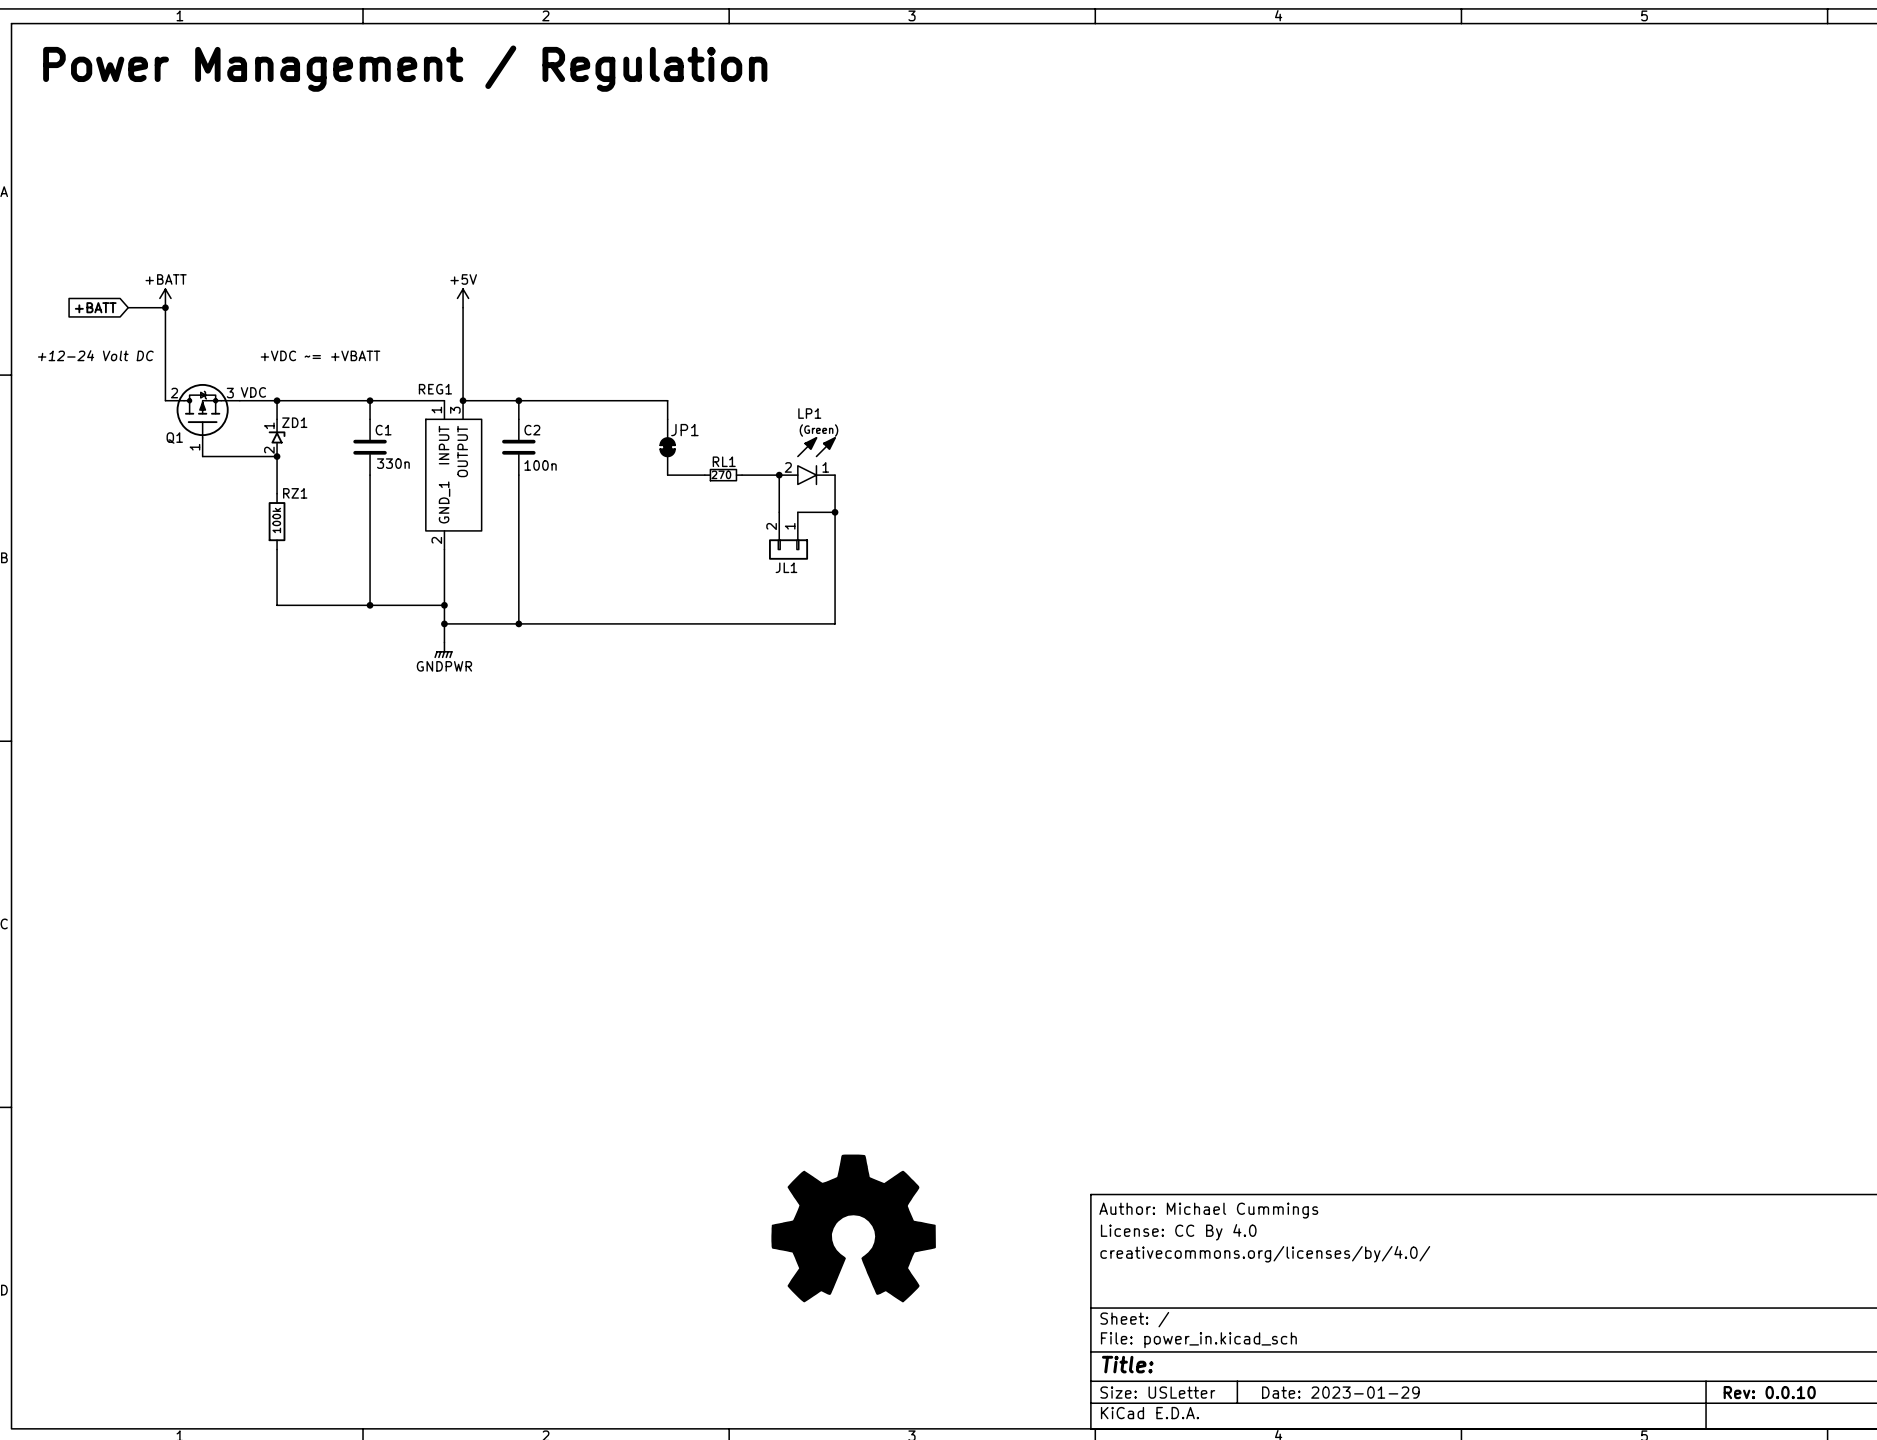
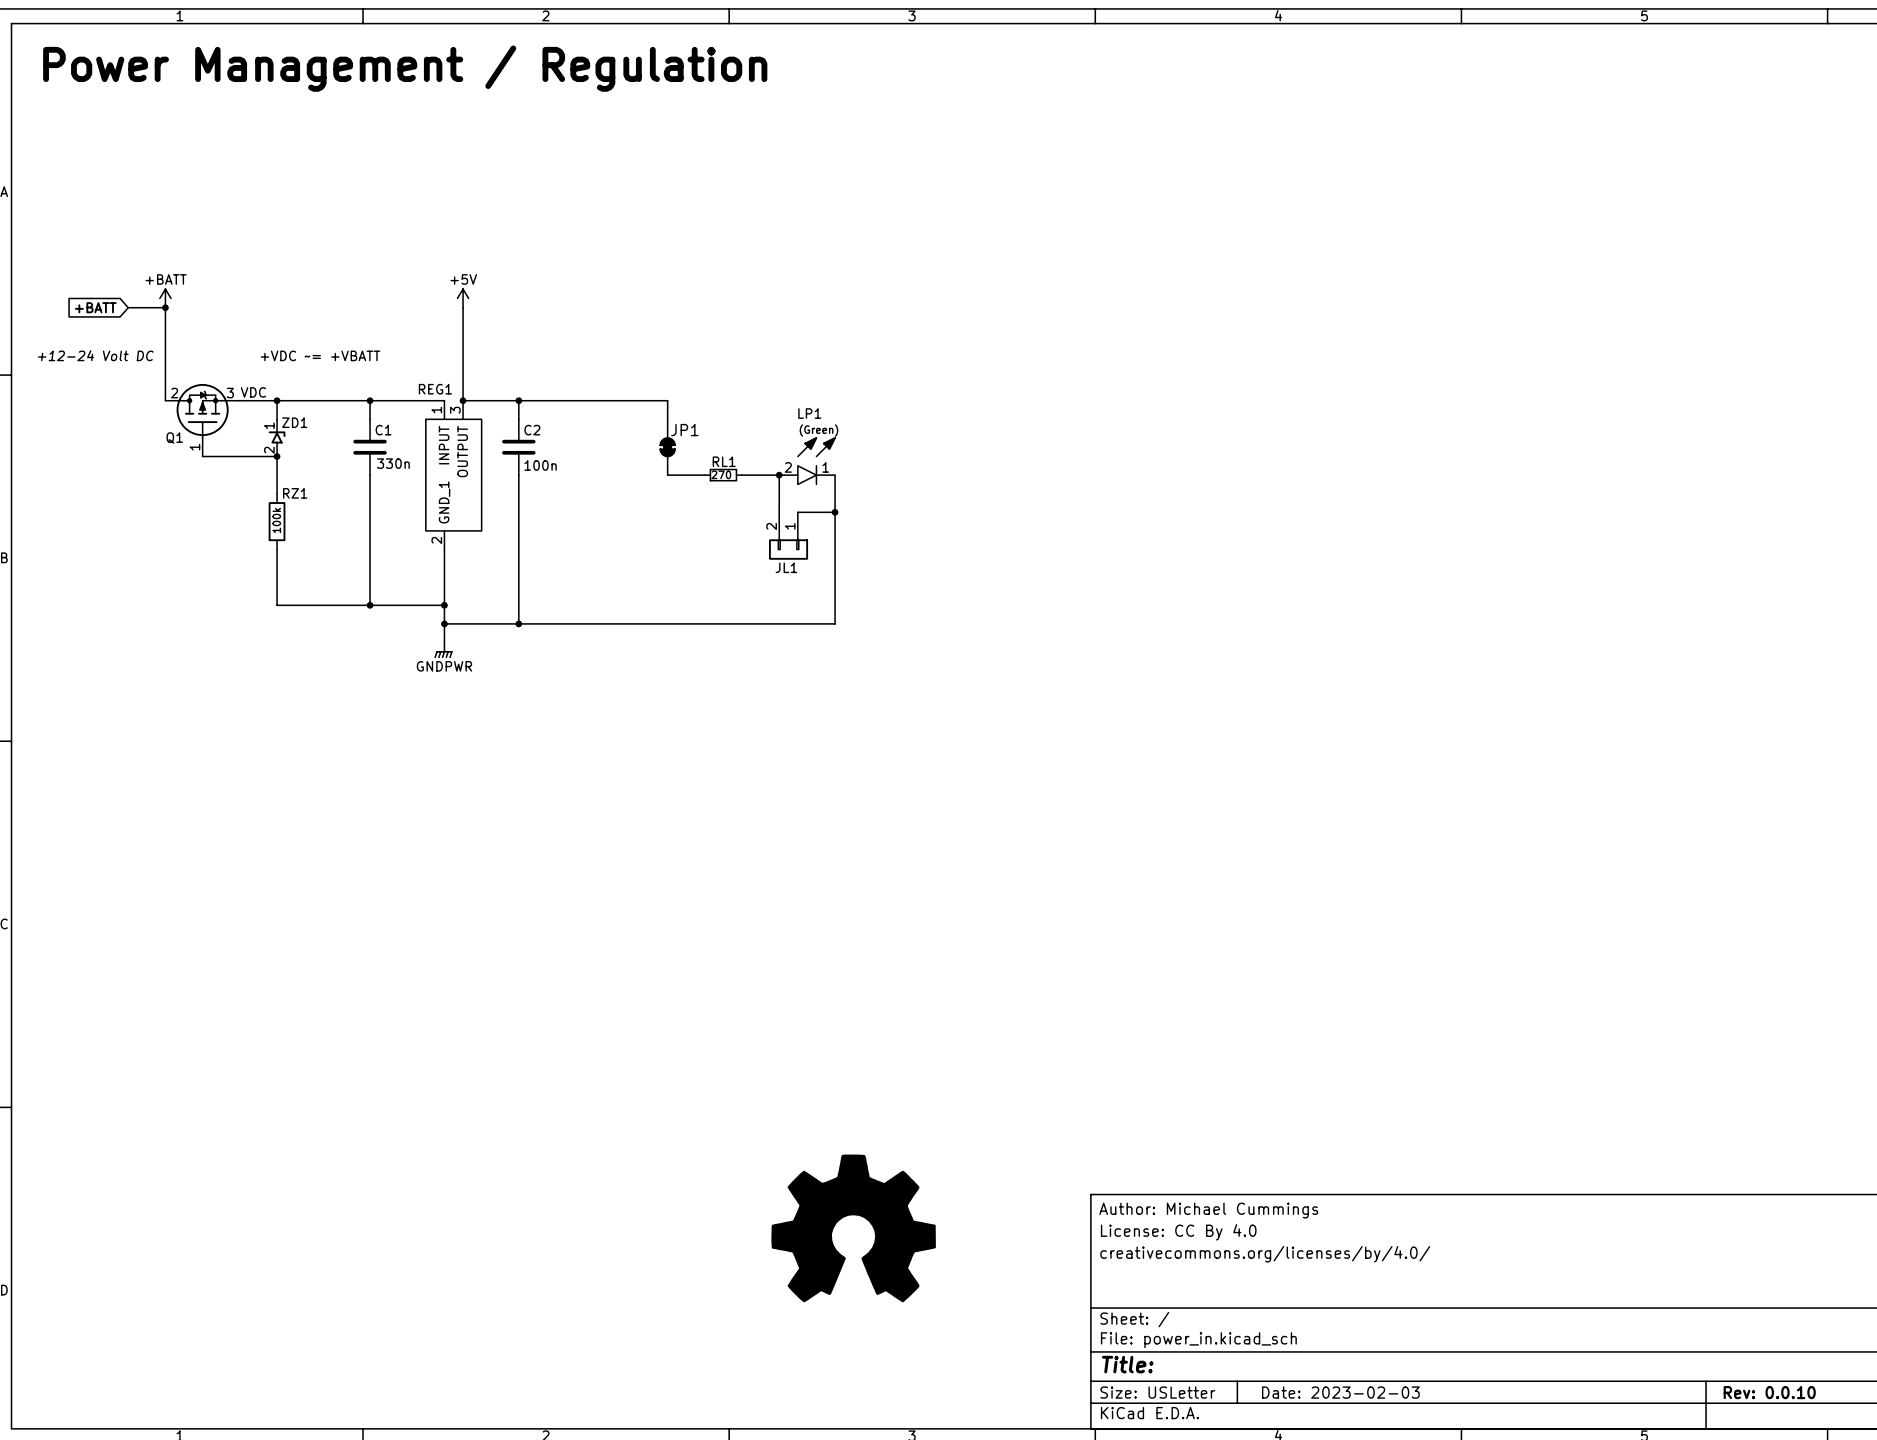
title block: Date: 2023-01-29 (1340, 1392) -> Date: 2023-02-03 (1340, 1392)

